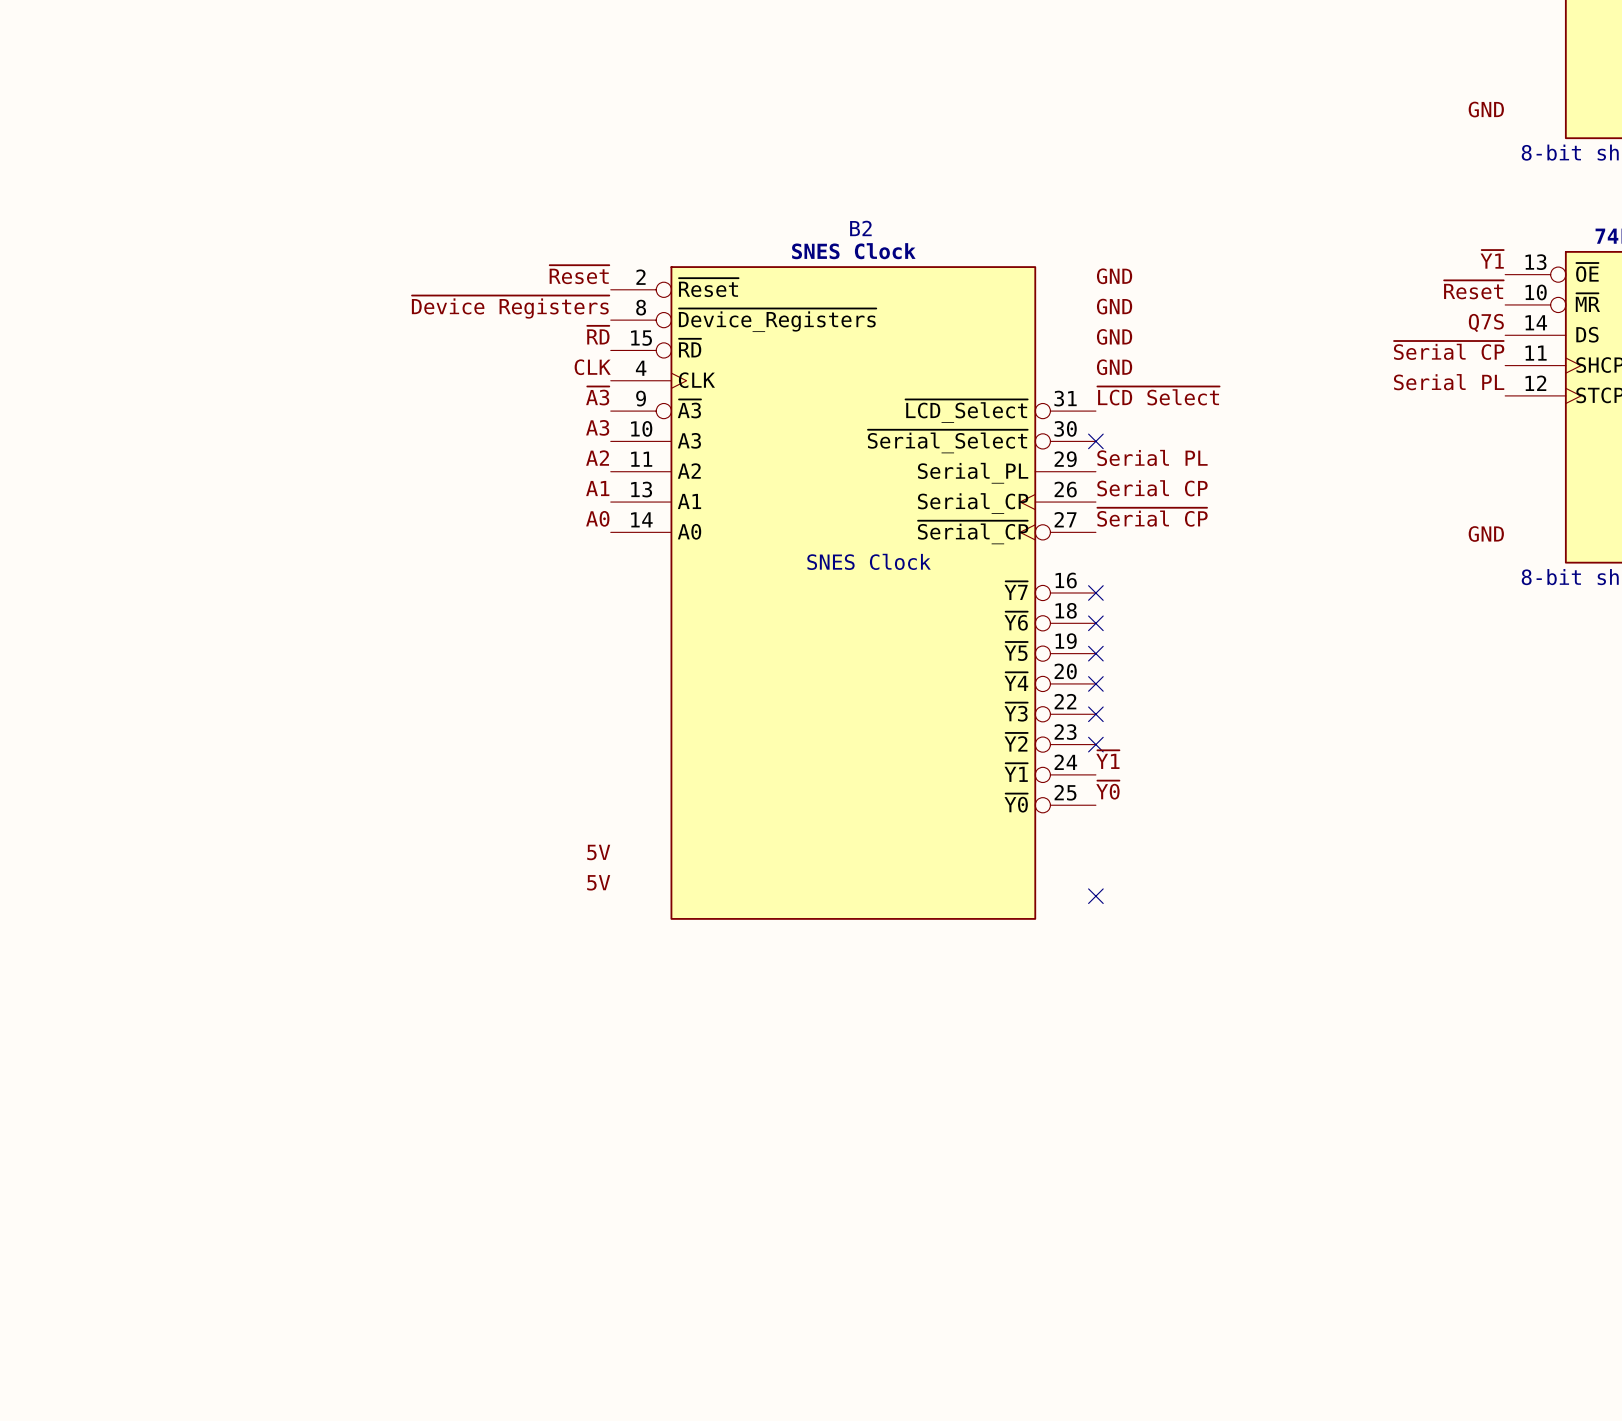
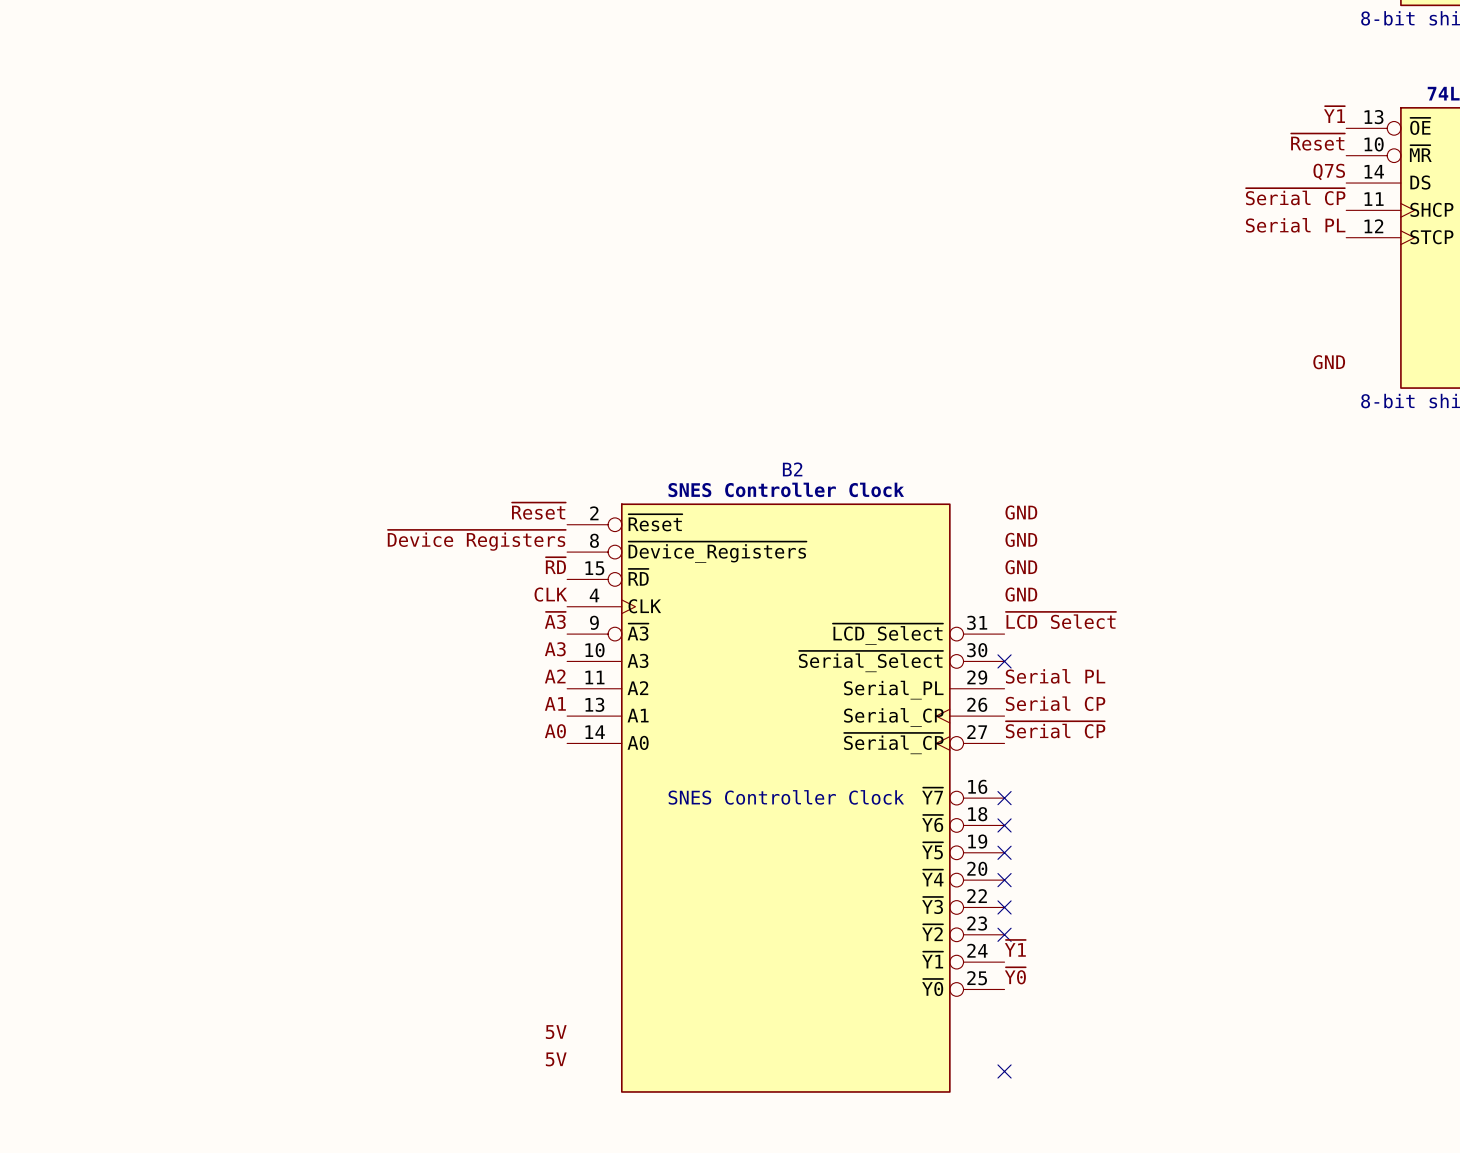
B2 value: SNES Clock (853, 251) -> SNES Controller Clock (786, 489)
label: ~{Reset} (579, 274) -> none
label: GND (1114, 276) -> none
label: GND (1114, 306) -> none
label: ~{Device Registers} (510, 307) -> none
label: ~{RD} (598, 335) -> none
label: GND (1114, 336) -> none
label: CLK (592, 367) -> none
label: GND (1114, 367) -> none
label: ~{A3} (597, 395) -> none
label: ~{LCD Select} (1158, 395) -> none
label: A3 (597, 427) -> none
no-connect mark: (1095, 441) -> none
label: Serial PL (1152, 457) -> none
label: A2 (597, 458) -> none
label: A1 (597, 488) -> none
label: Serial CP (1152, 488) -> none
label: ~{Serial CP} (1152, 517) -> none
label: A0 (597, 518) -> none
B2 text: SNES Clock (869, 561) -> SNES Controller Clock (786, 797)
B2 position: (853, 592) -> (785, 798)
no-connect mark: (1095, 592) -> none
no-connect mark: (1095, 623) -> none
no-connect mark: (1095, 653) -> none
no-connect mark: (1095, 683) -> none
label: none -> ~{Reset} (538, 511)
label: none -> GND (1021, 512)
no-connect mark: (1095, 714) -> none
label: none -> ~{Device Registers} (476, 540)
label: none -> GND (1021, 539)
no-connect mark: (1095, 744) -> none
label: none -> ~{RD} (555, 565)
label: ~{Y1} (1107, 759) -> none
label: none -> GND (1021, 567)
label: ~{Y0} (1107, 790) -> none
label: none -> CLK (550, 594)
label: none -> GND (1021, 594)
label: none -> ~{A3} (555, 620)
label: none -> ~{LCD Select} (1060, 620)
label: 5V (598, 852) -> none
label: none -> A3 (555, 649)
label: 5V (598, 882) -> none
label: none -> A2 (555, 676)
label: none -> Serial PL (1055, 676)
no-connect mark position: (1095, 896) -> (1004, 661)
label: none -> A1 (555, 703)
label: none -> Serial CP (1055, 703)
label: none -> ~{Serial CP} (1055, 729)
label: none -> A0 (555, 731)
no-connect mark: none -> (1004, 798)
no-connect mark: none -> (1004, 825)
no-connect mark: none -> (1004, 852)
no-connect mark: none -> (1004, 880)
no-connect mark: none -> (1004, 907)
no-connect mark: none -> (1004, 934)
label: none -> ~{Y1} (1015, 948)
label: none -> ~{Y0} (1015, 975)
label: none -> 5V (556, 1032)
label: none -> 5V (556, 1059)
no-connect mark: none -> (1004, 1071)

